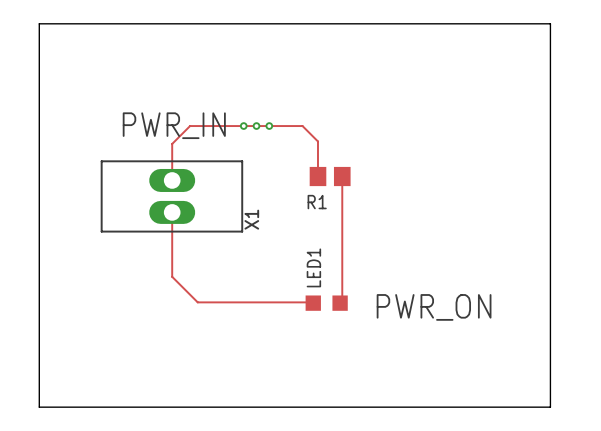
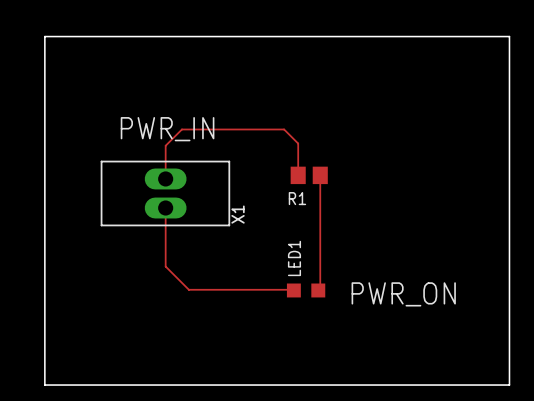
via: (243, 126) -> none
via: (256, 126) -> none
via: (269, 126) -> none

